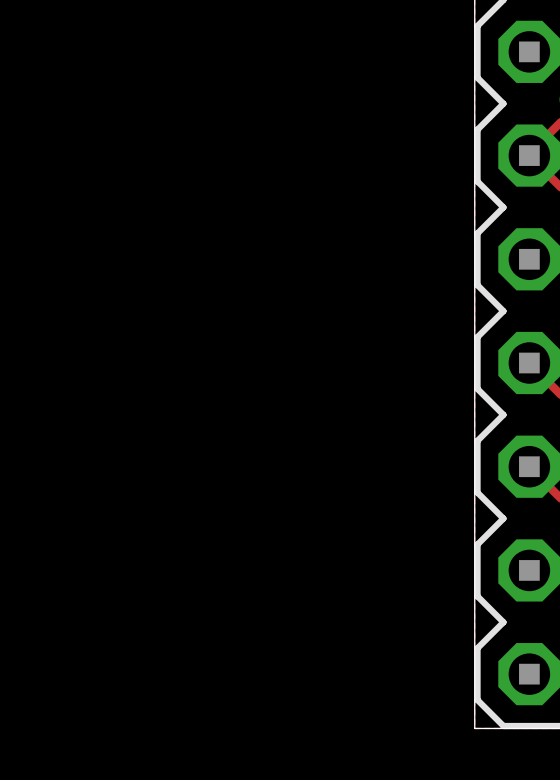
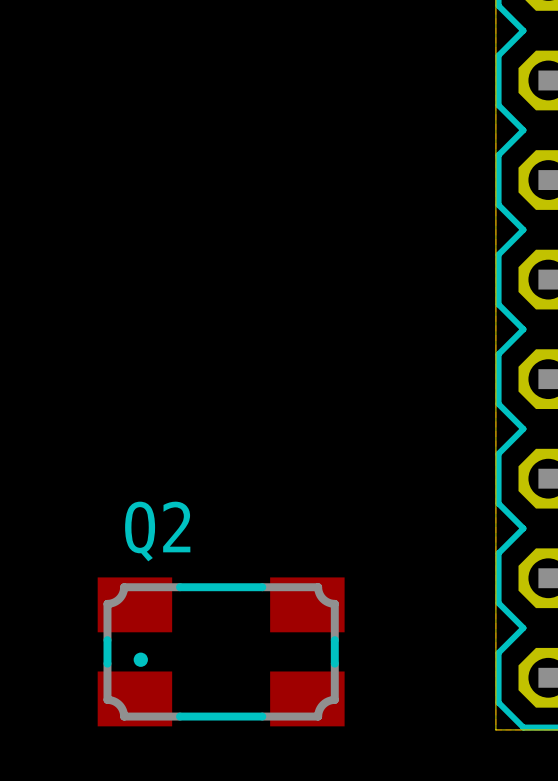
Q2: none -> (221, 651)

